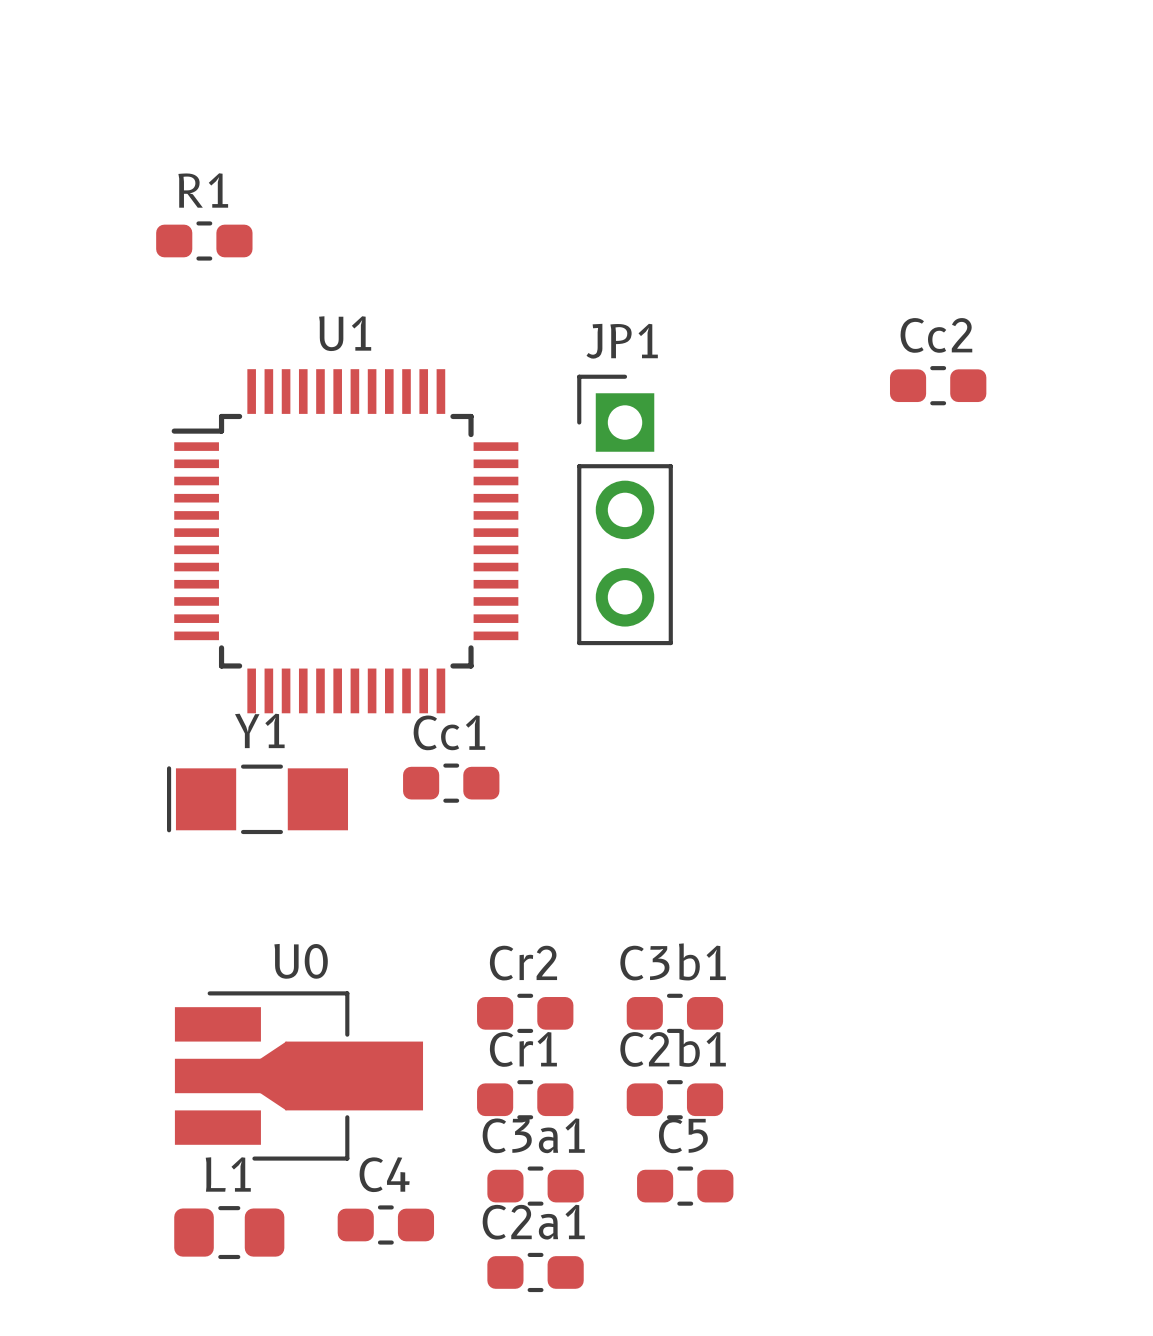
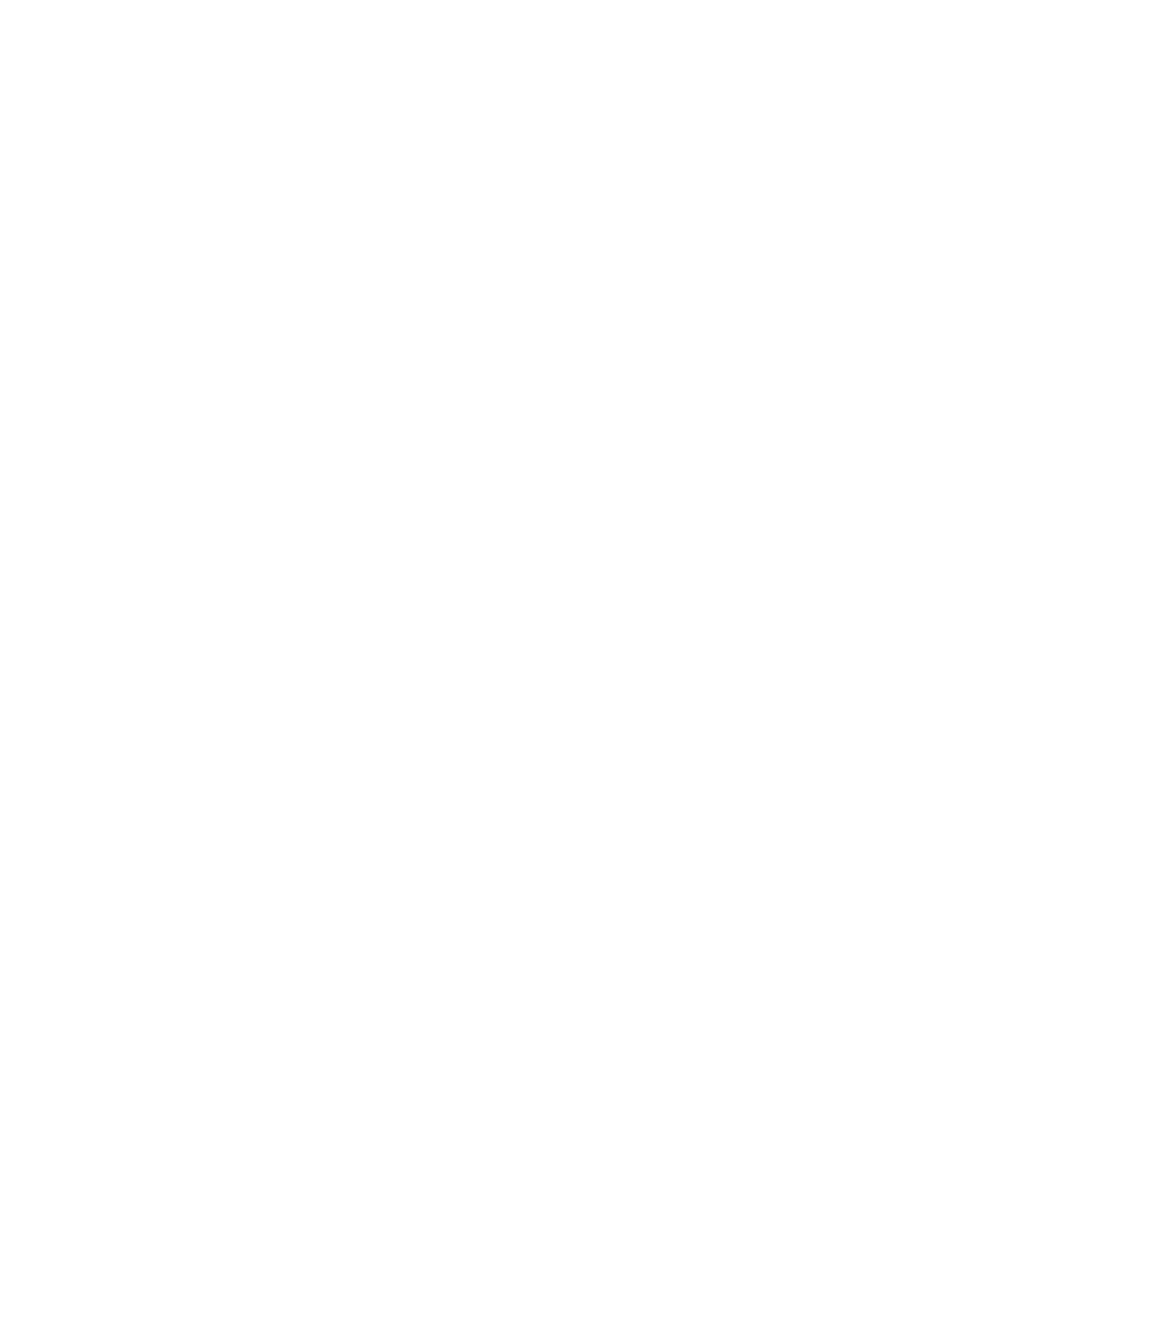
R1: (204, 240) -> none
Cc2: (938, 385) -> none
JP1: (625, 509) -> none
U1: (344, 541) -> none
Cc1: (451, 783) -> none
Y1: (257, 799) -> none
Cr2: (525, 1013) -> none
C3b1: (674, 1013) -> none
U0: (298, 1075) -> none
Cr1: (525, 1099) -> none
C2b1: (674, 1099) -> none
C3a1: (535, 1186) -> none
C5: (685, 1186) -> none
C4: (385, 1224) -> none
L1: (229, 1232) -> none
C2a1: (535, 1272) -> none

